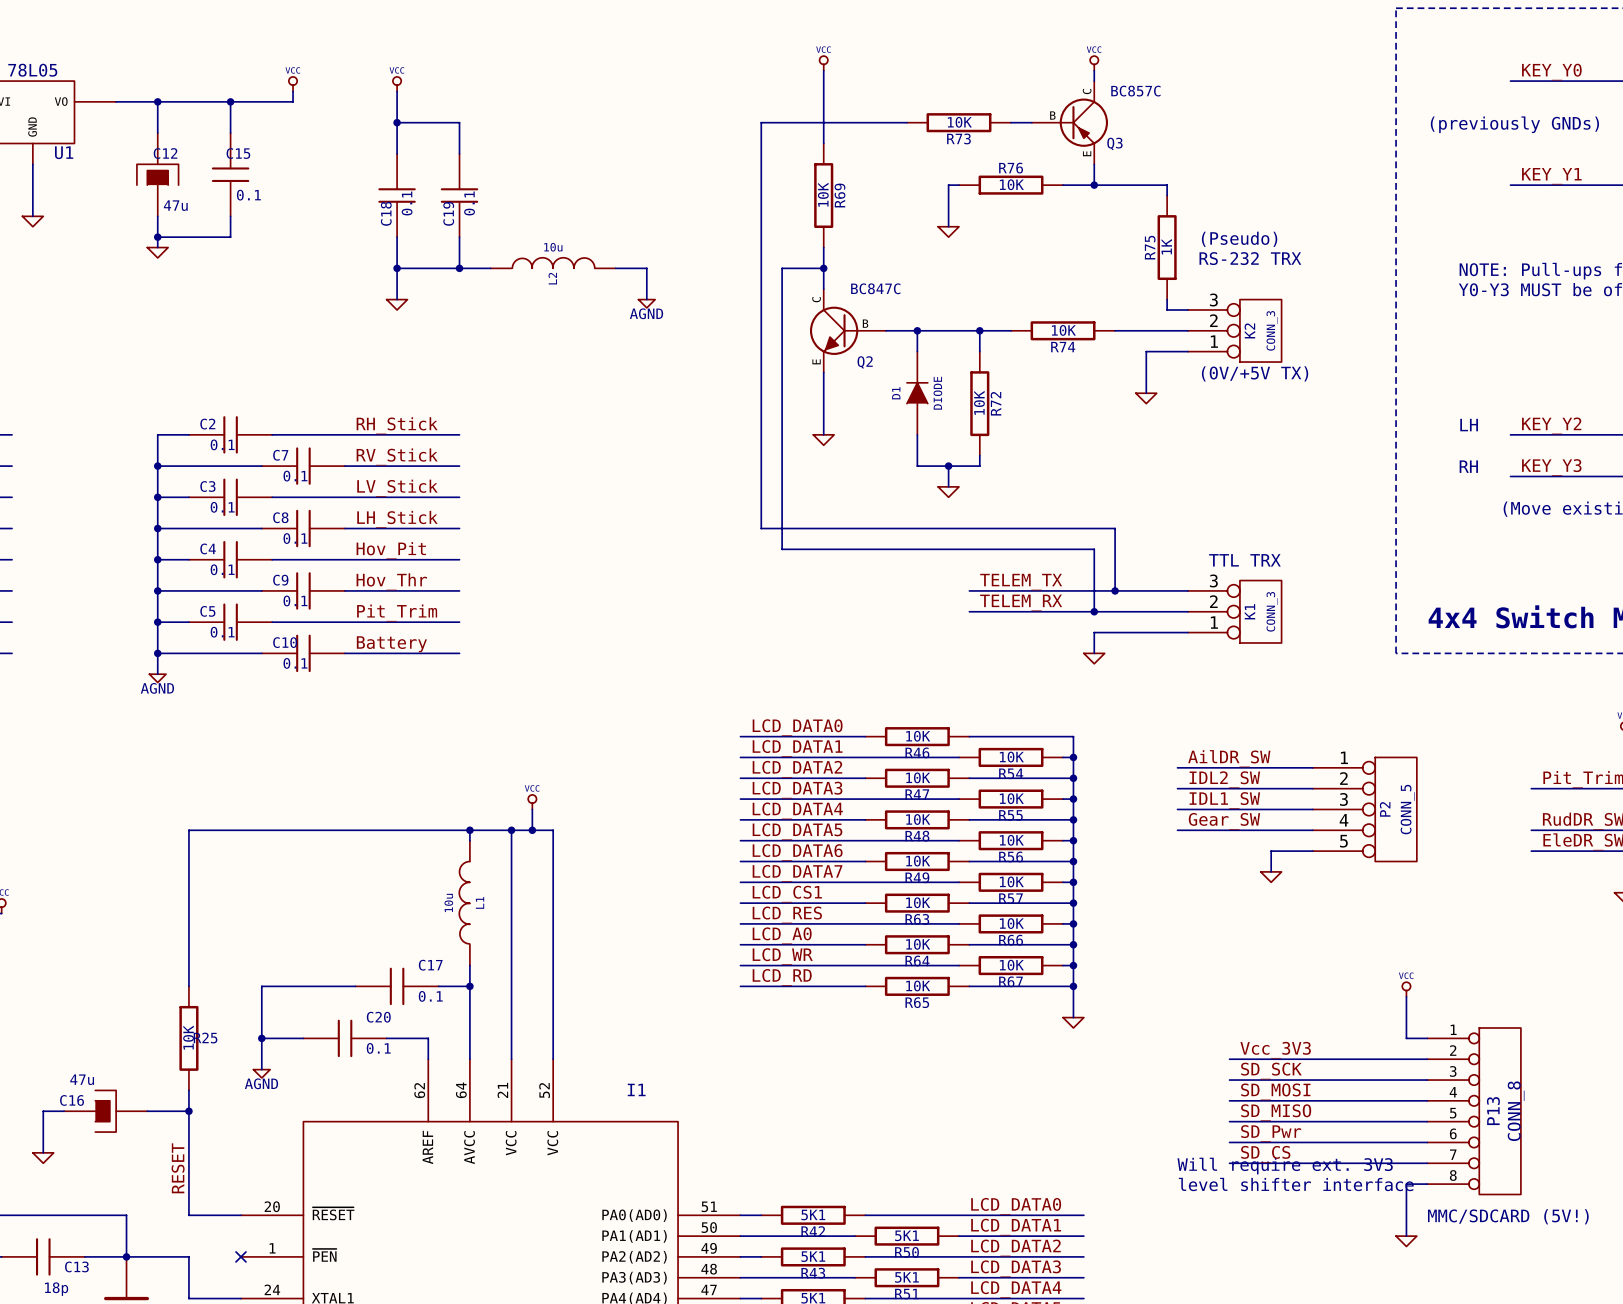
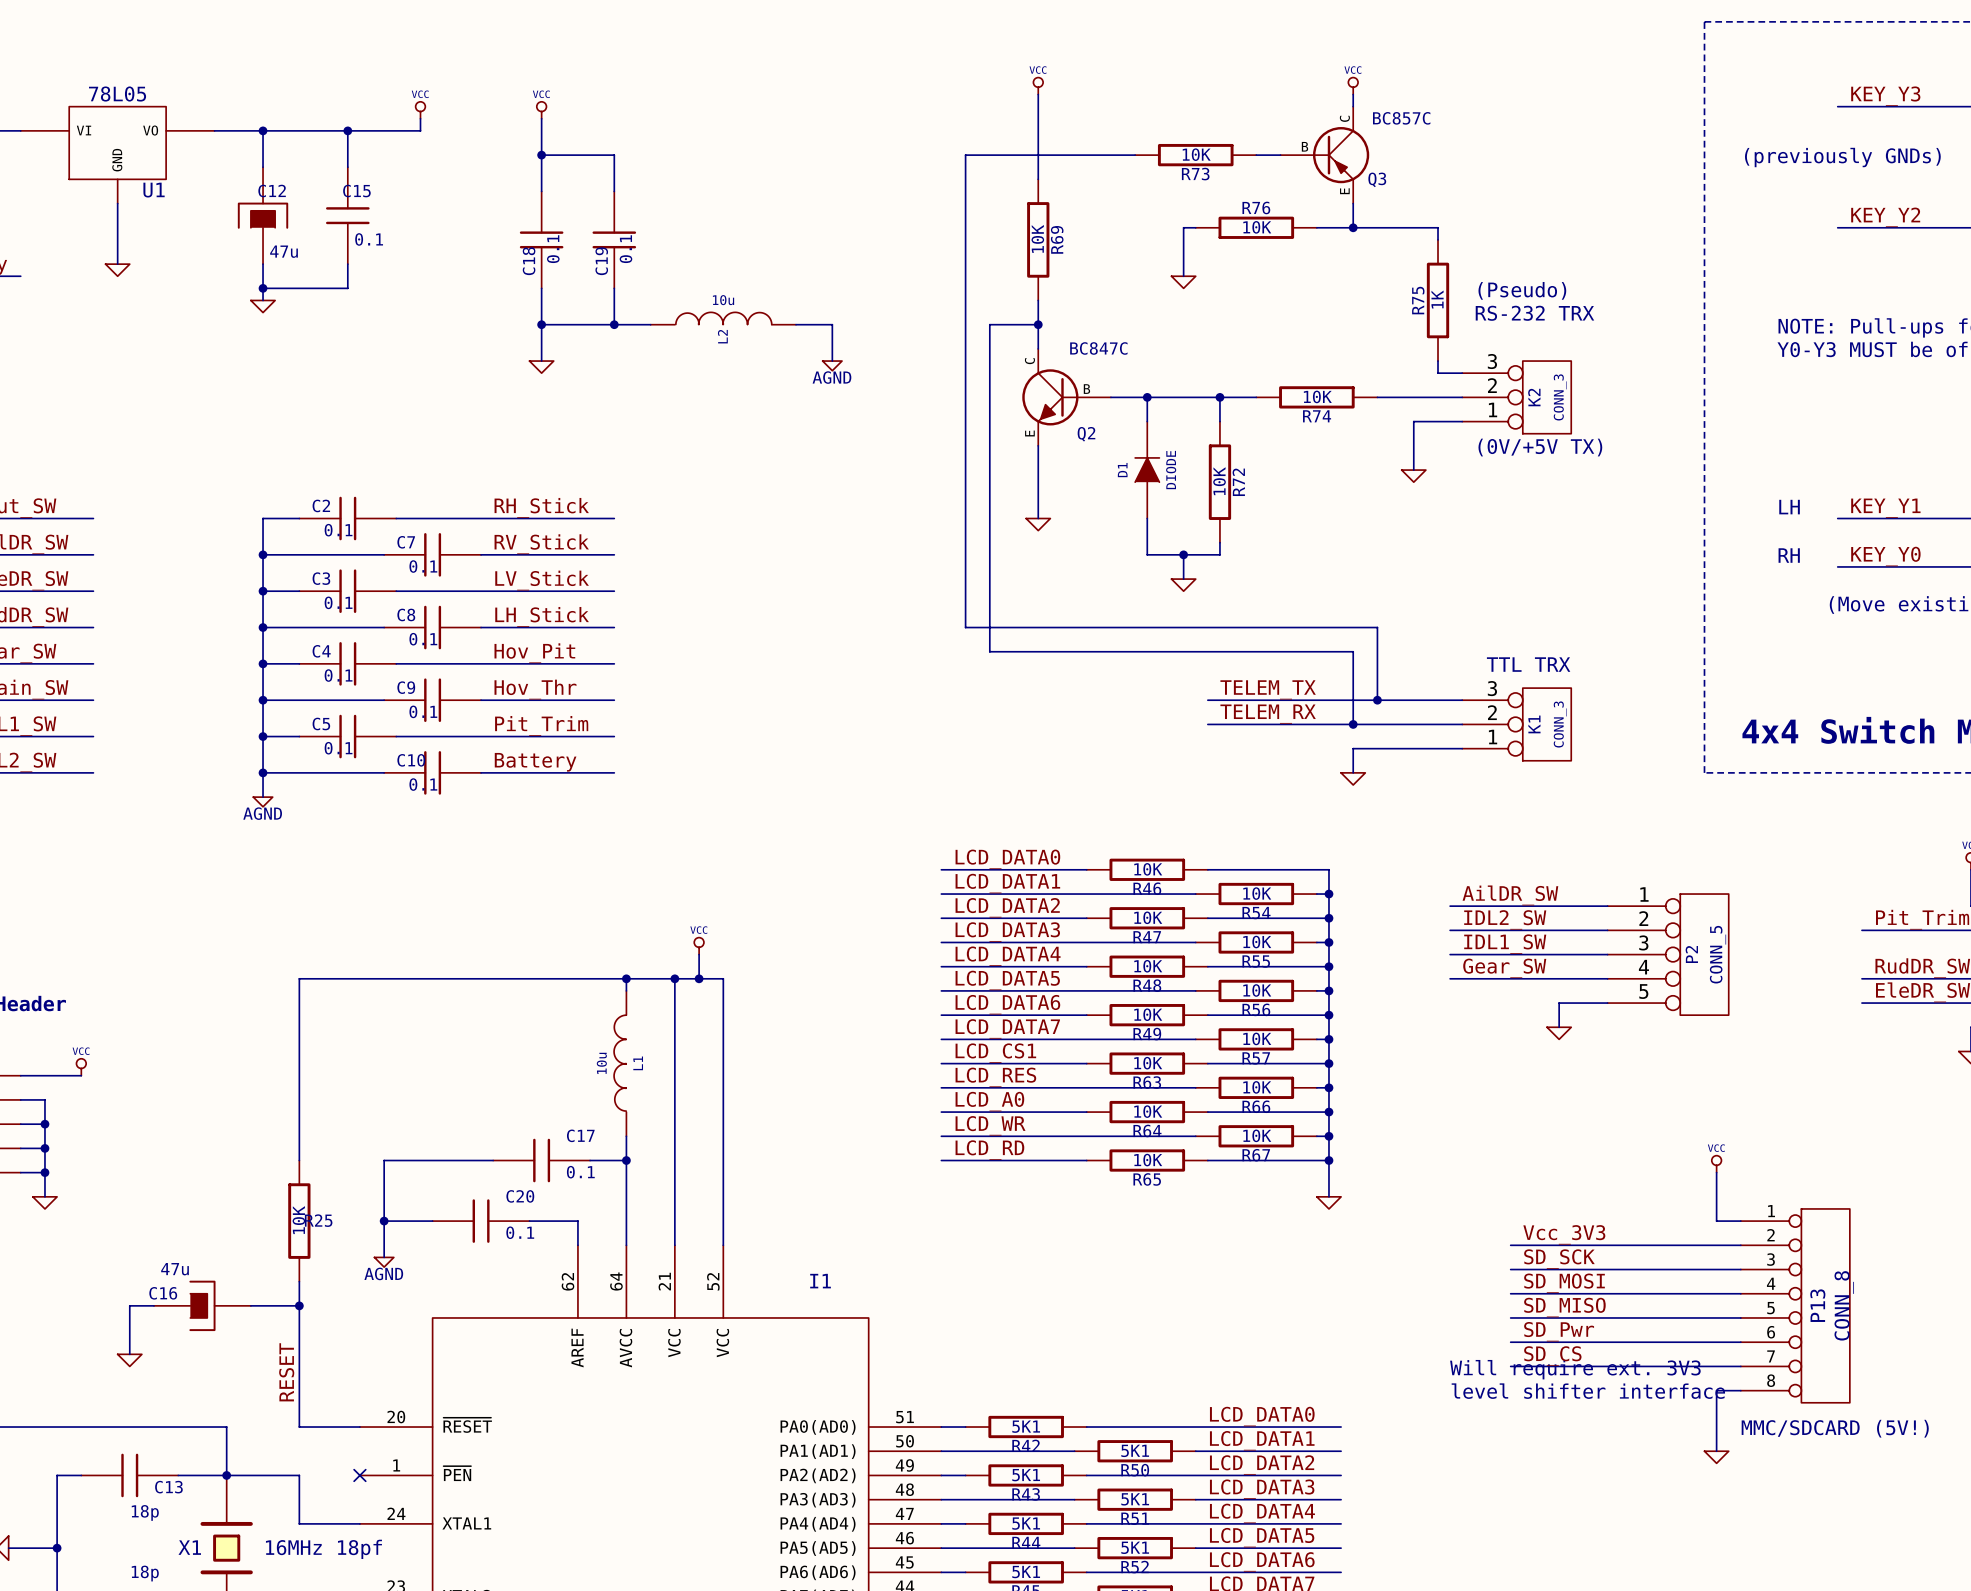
label: KEY_Y0 (1551, 72) -> KEY_Y3 (1885, 96)
label: KEY_Y1 (1551, 176) -> KEY_Y2 (1885, 217)
label: KEY_Y2 (1551, 425) -> KEY_Y1 (1885, 508)
label: KEY_Y3 (1551, 467) -> KEY_Y0 (1885, 556)

